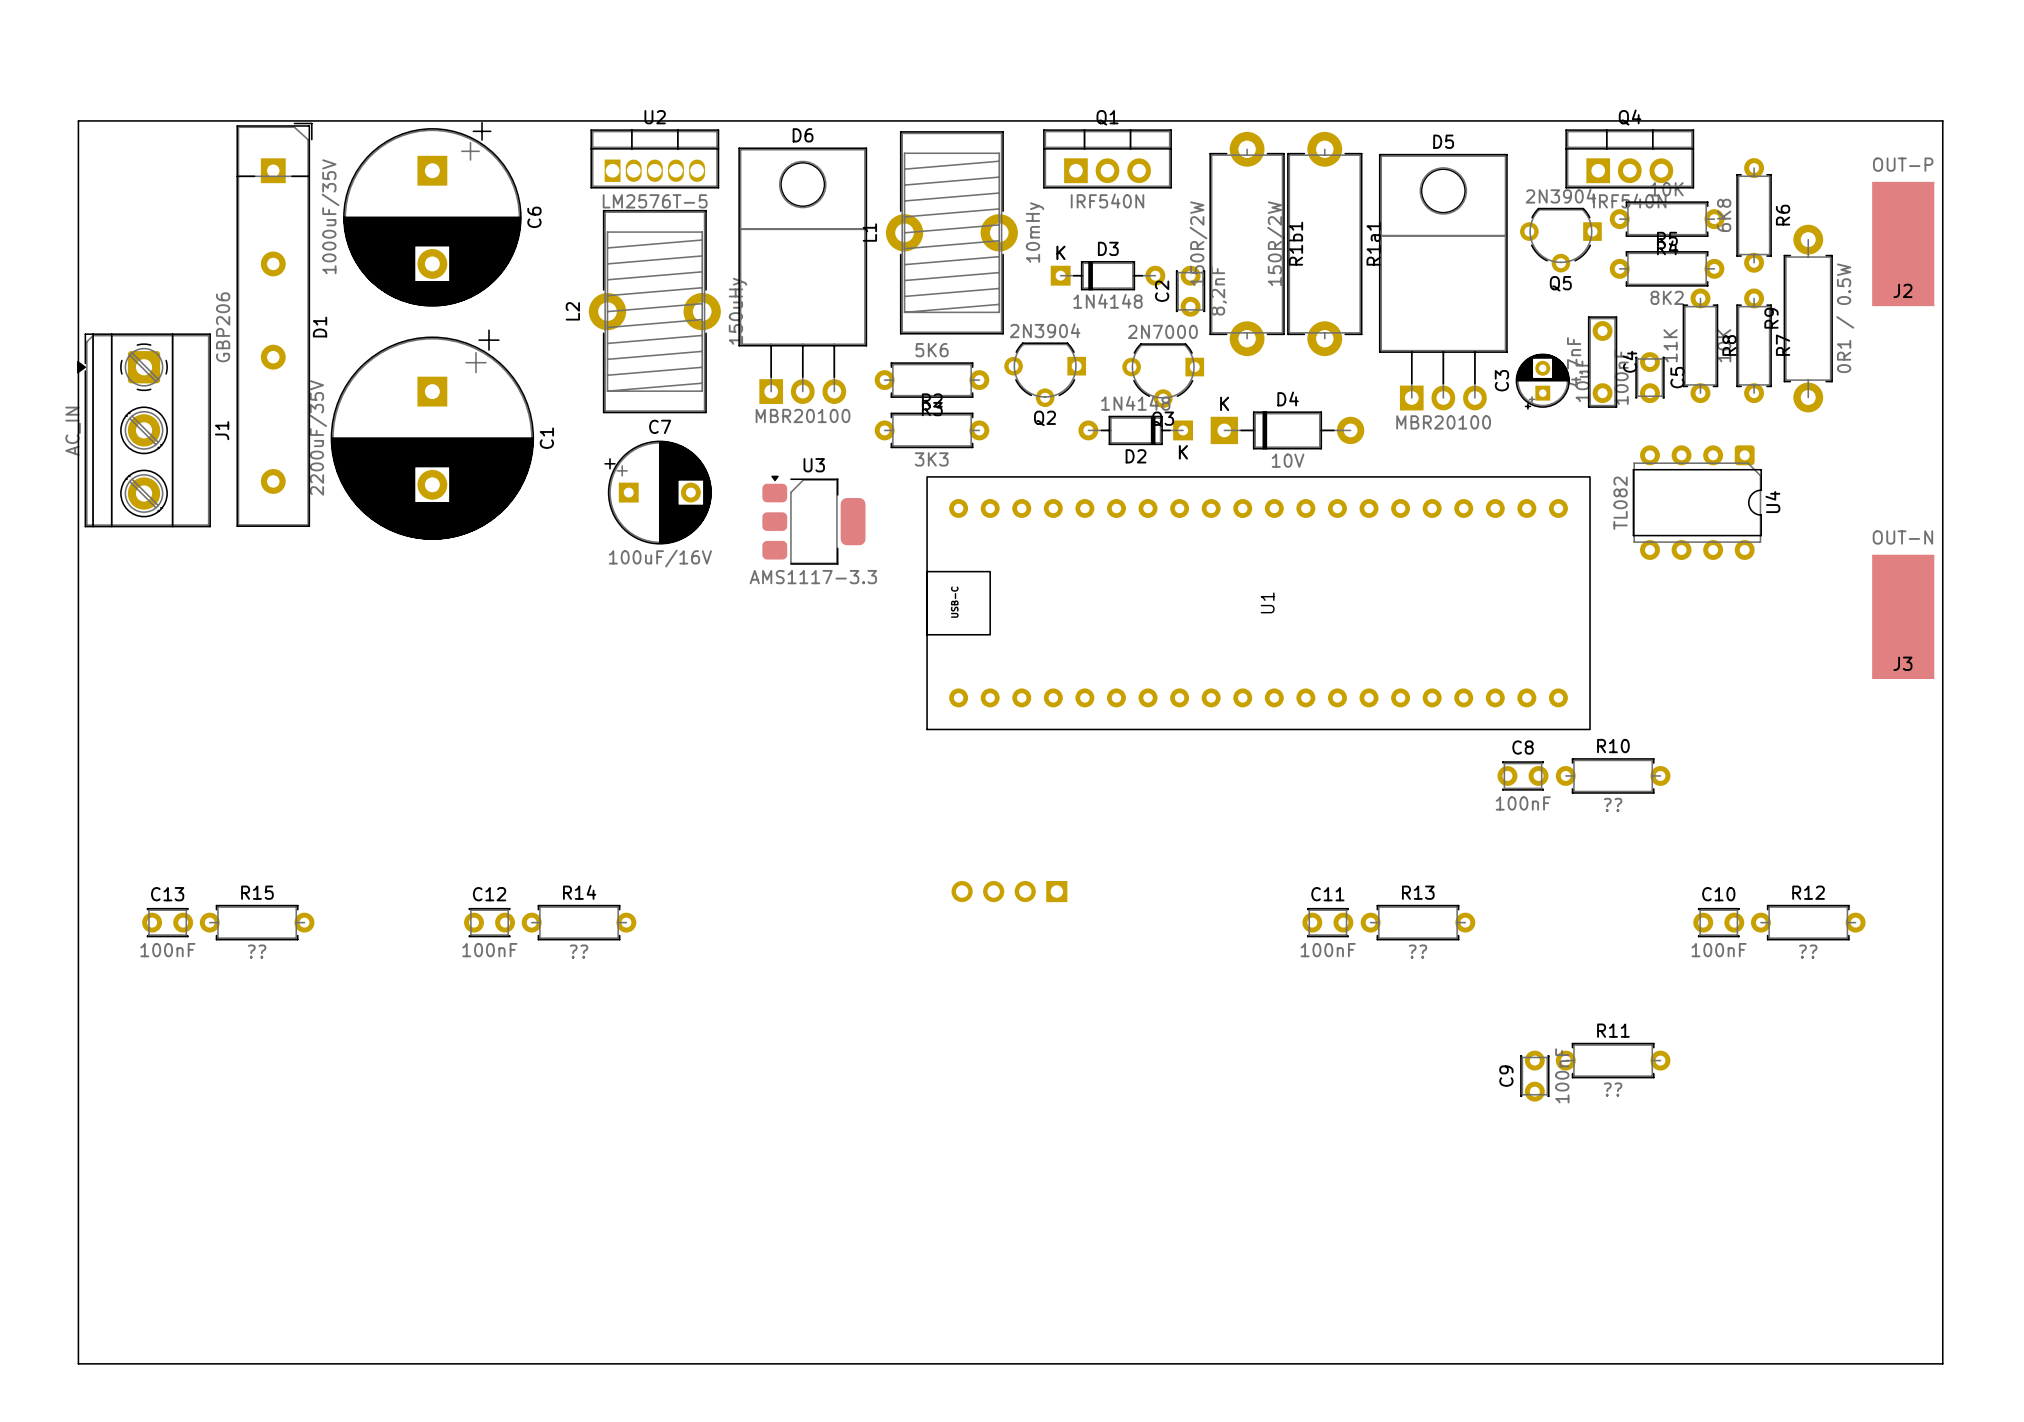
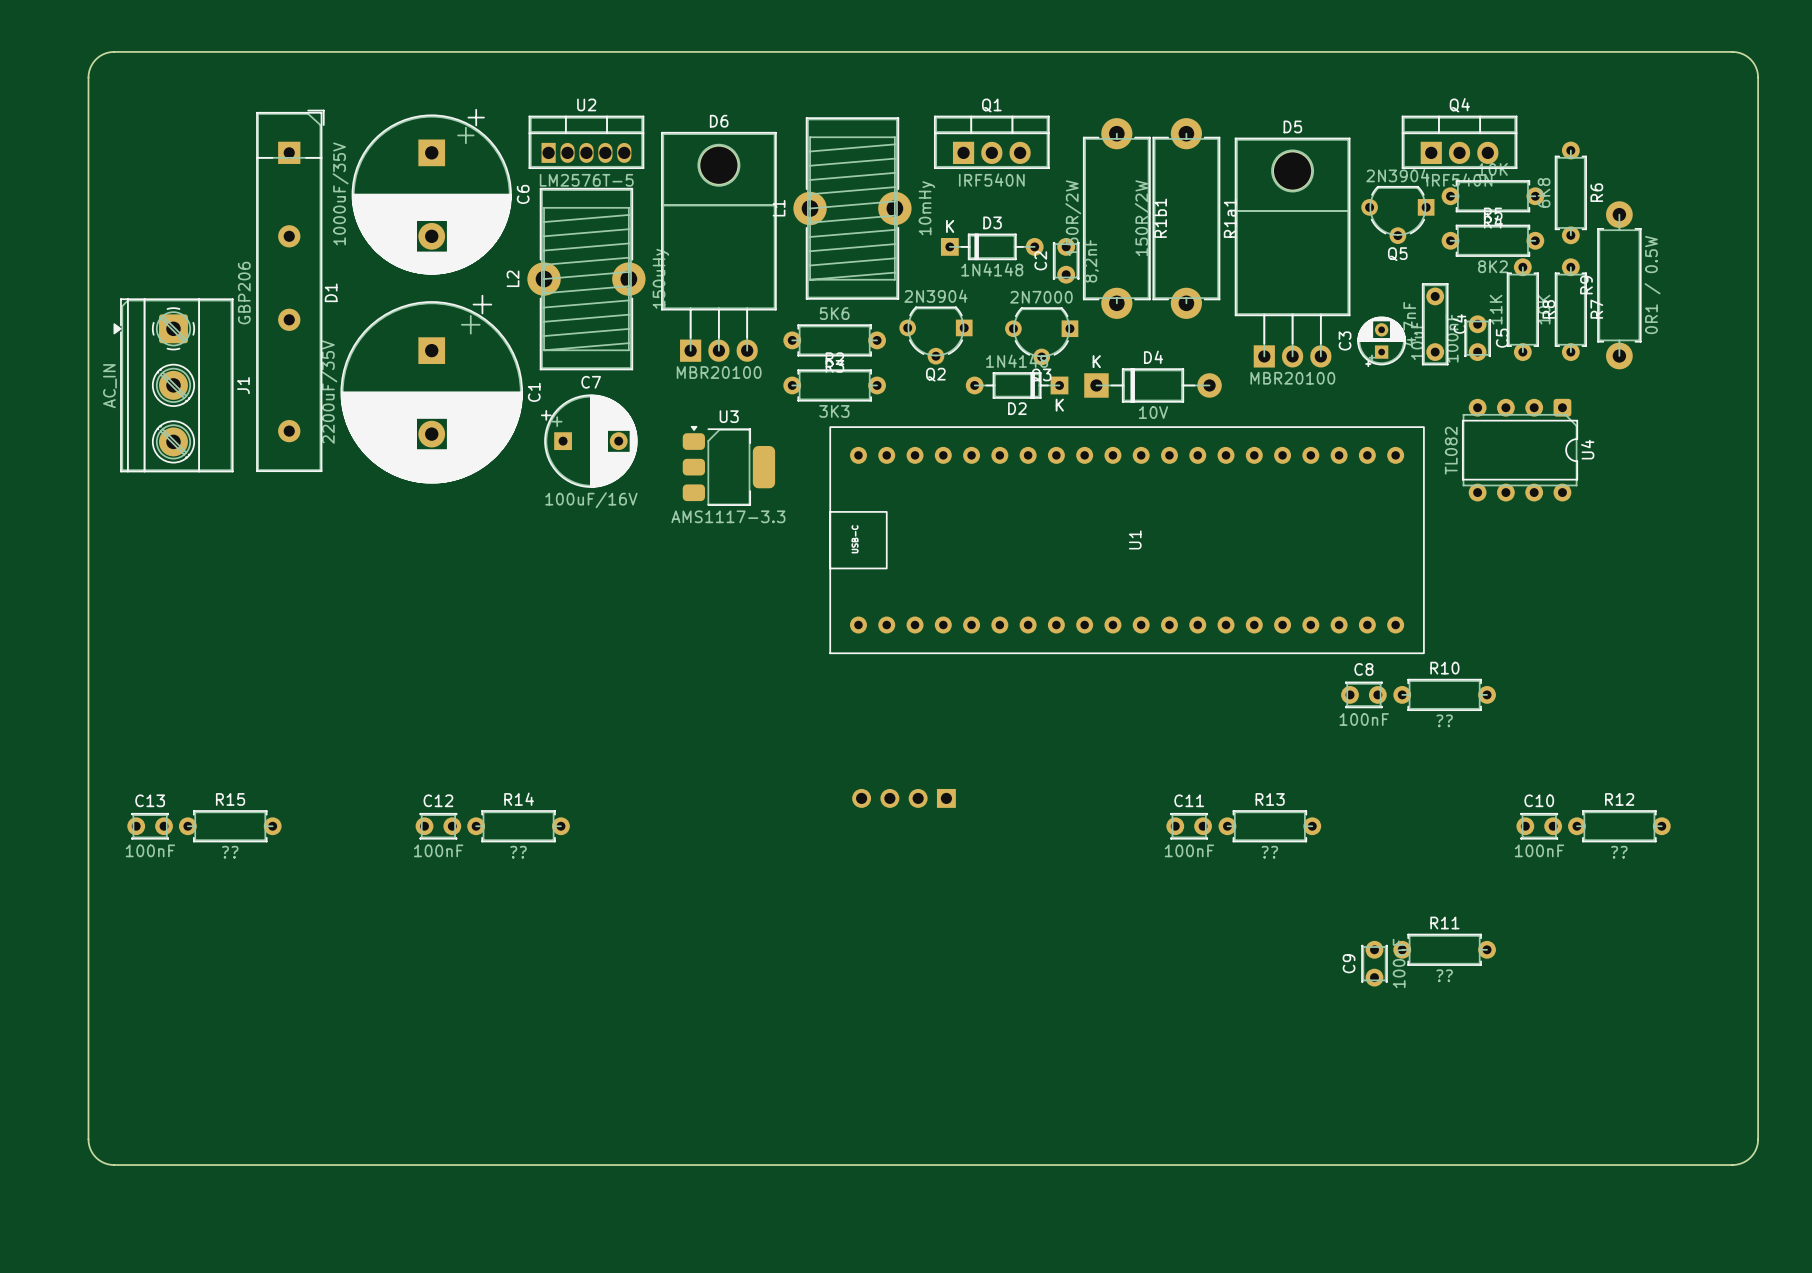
board edge: (78, 120) (1942, 120) (1942, 1363) (78, 1363) (78, 120) -> (114, 51) (102, 54) (95, 59) (89, 69) (88, 77) (88, 1139) (91, 1150) (100, 1161) (114, 1165) (1732, 1165) (1746, 1161) (1754, 1153) (1758, 1139) (1758, 77) (1755, 66) (1746, 55) (1732, 51) (114, 51)
C6 position: (432, 214) -> (431, 191)
J2: OUT-P (1903, 244) -> none
D1 position: (274, 324) -> (290, 290)
J1 position: (143, 430) -> (173, 385)
C1 position: (432, 434) -> (431, 389)
J3: OUT-N (1903, 616) -> none

